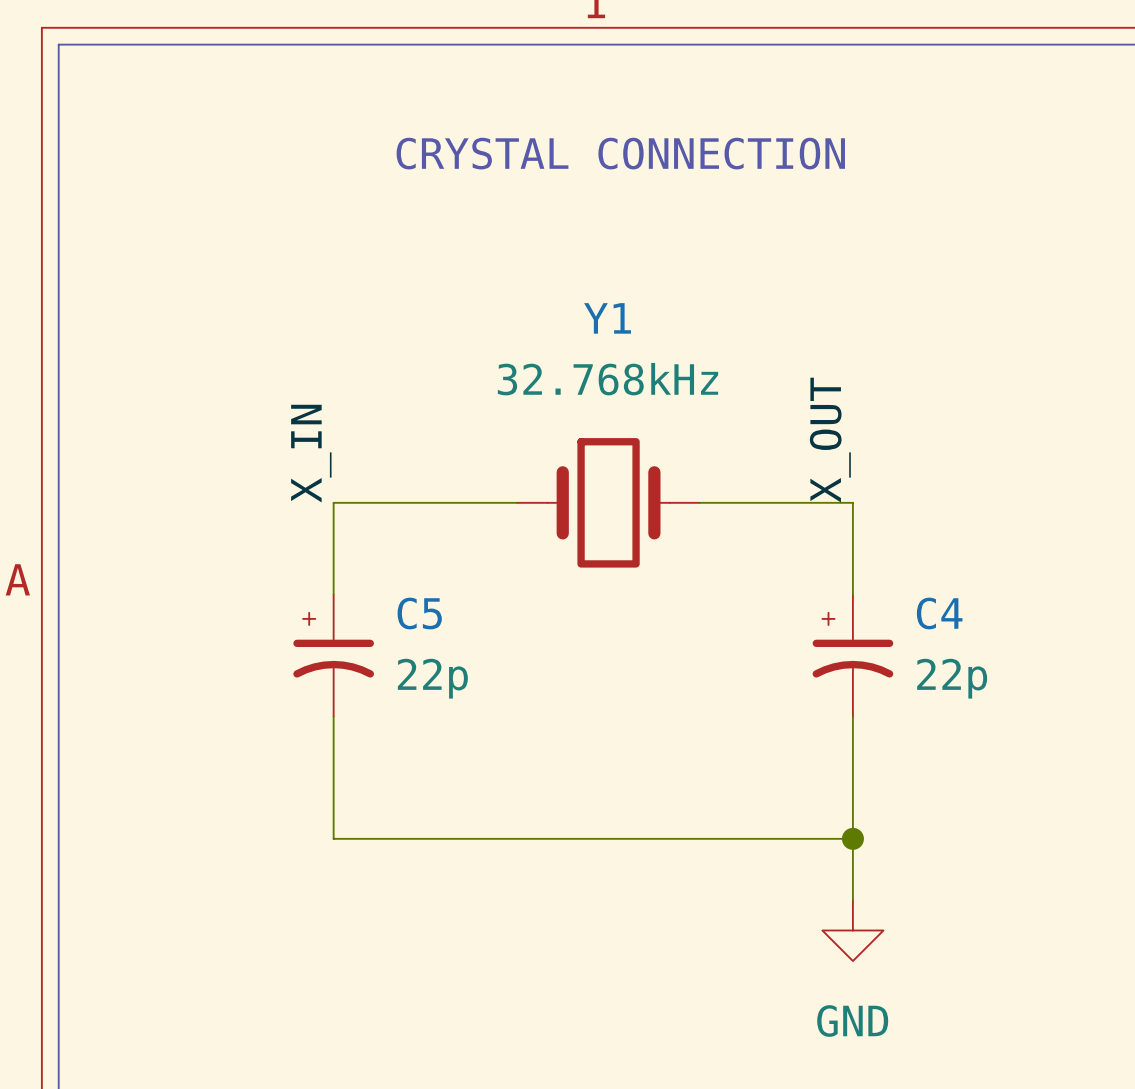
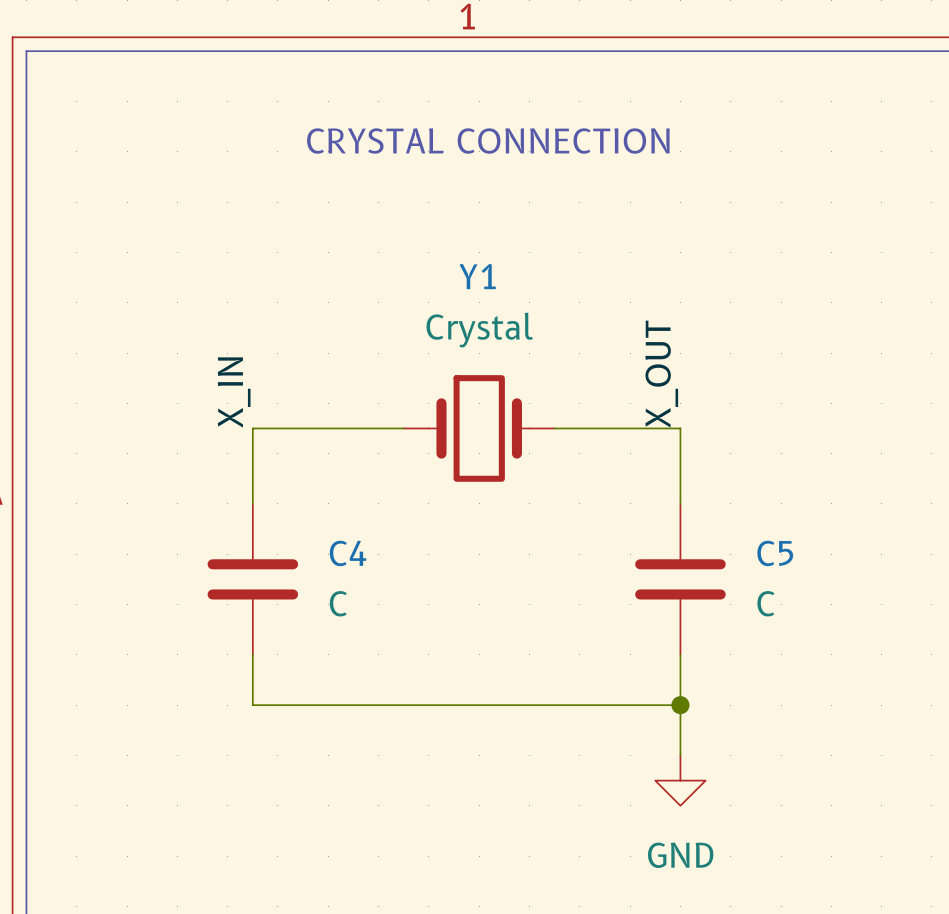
Y1 value: 32.768kHz (607, 379) -> Crystal (479, 330)
C5 symbol: [293, 594, 374, 717] -> [635, 503, 726, 655]
C4 symbol: [812, 594, 894, 717] -> [207, 503, 299, 655]
C5 value: 22p (432, 678) -> C (765, 603)
C4 value: 22p (952, 678) -> C (338, 603)

